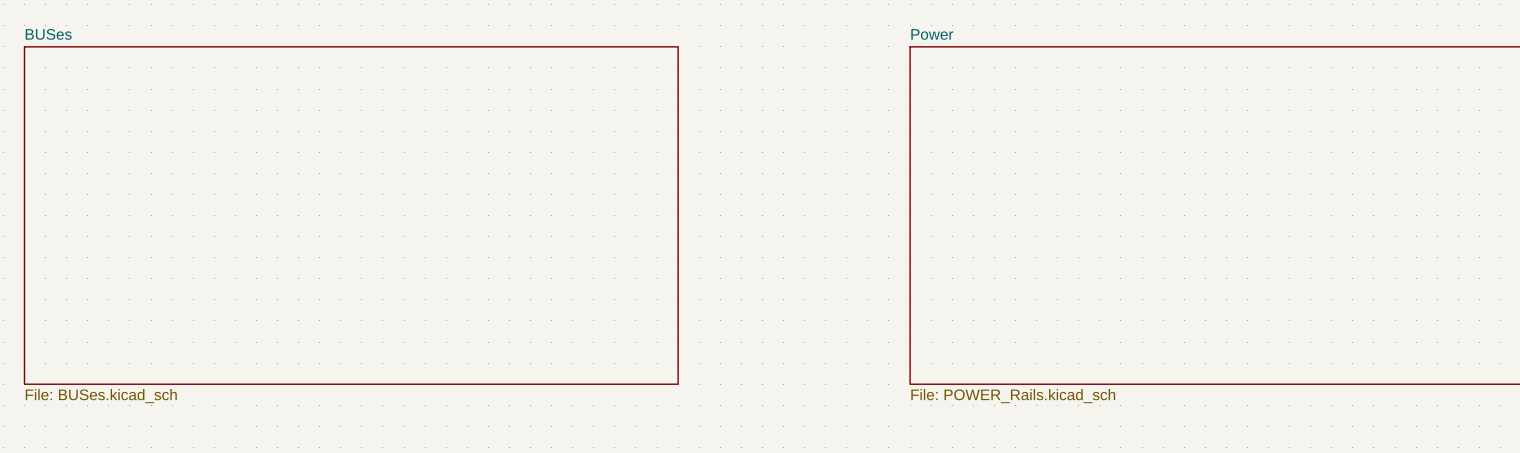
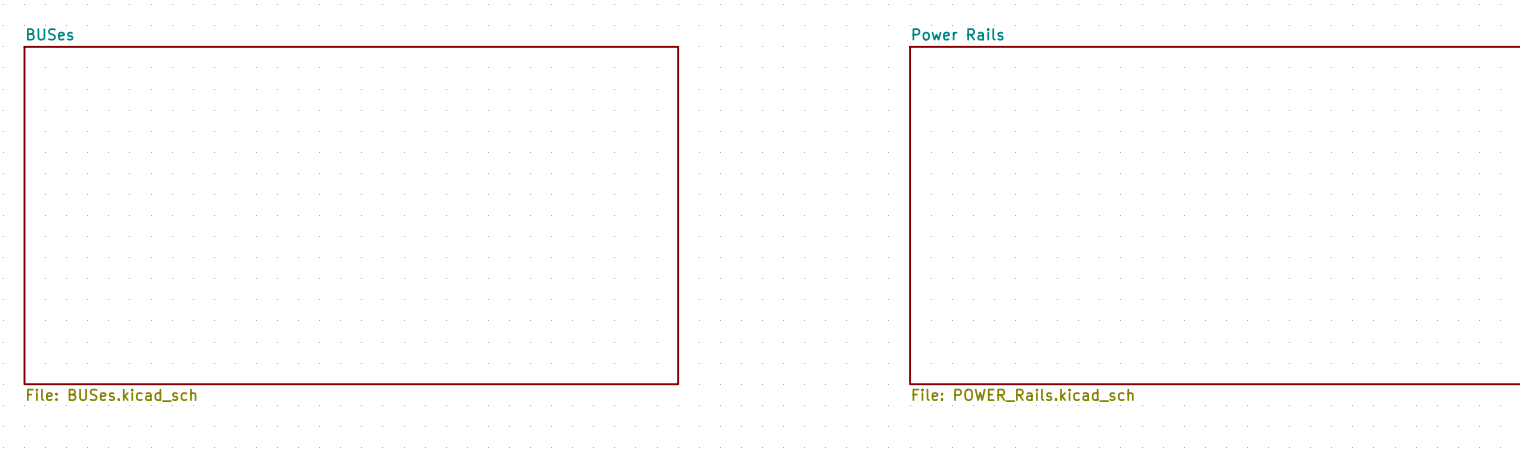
sheet Power name: Power (932, 34) -> Power Rails (958, 34)

